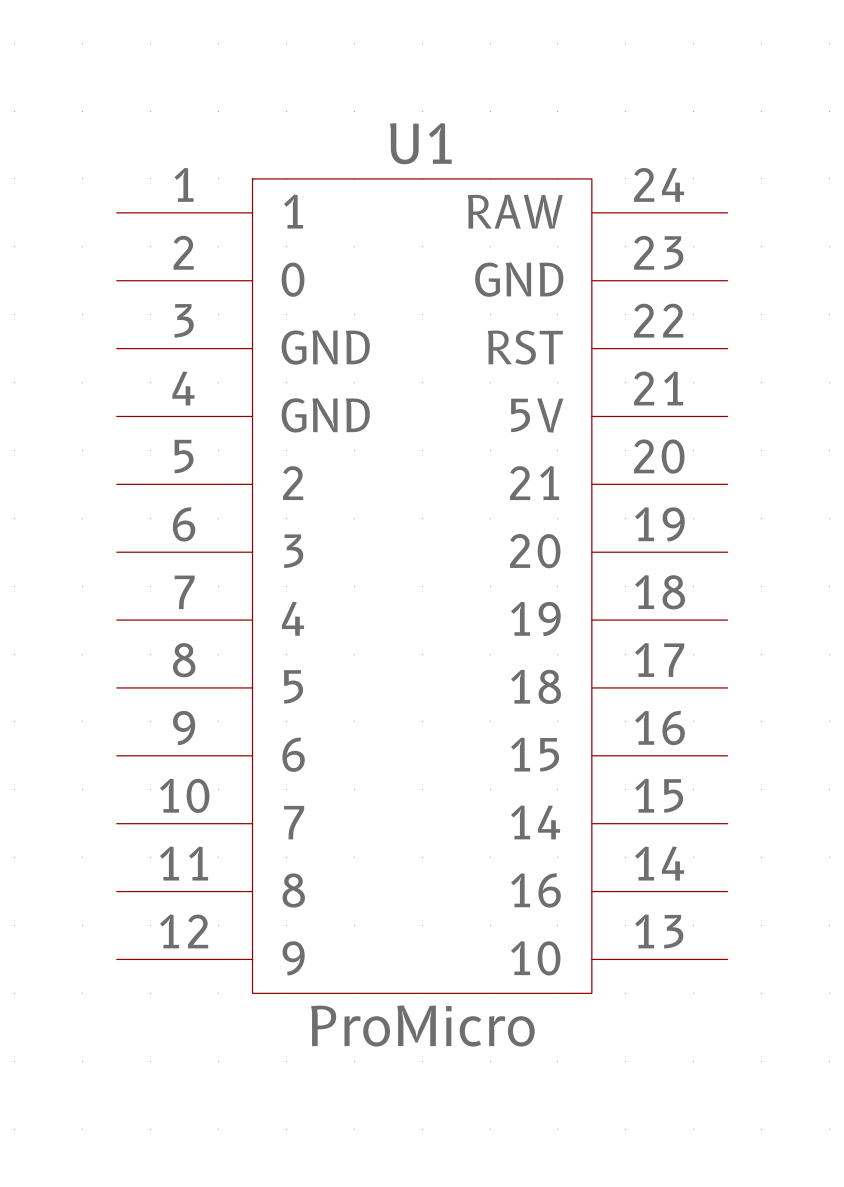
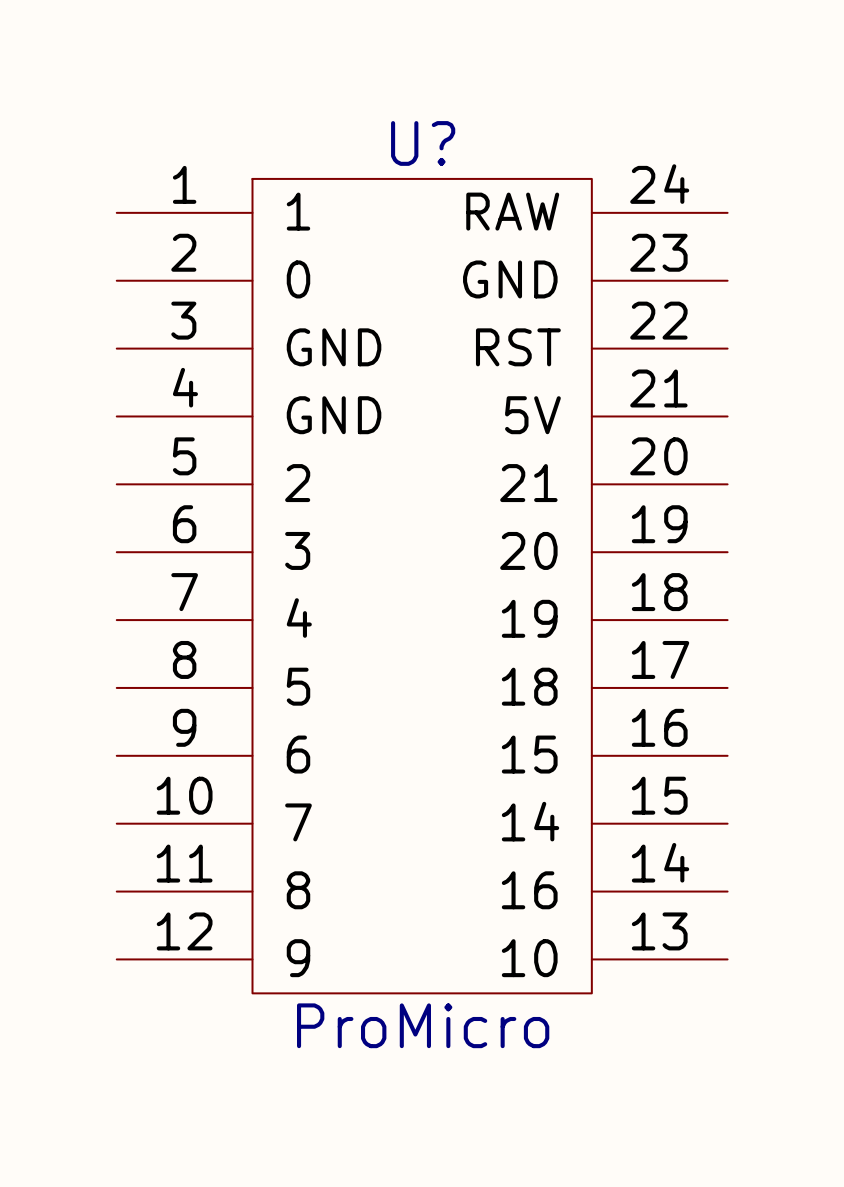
U1 name: U1 (420, 143) -> U? (423, 143)

